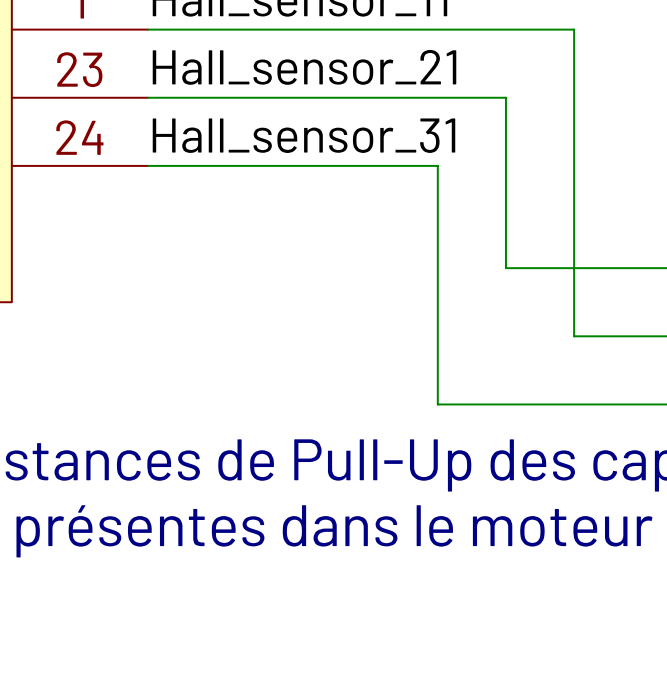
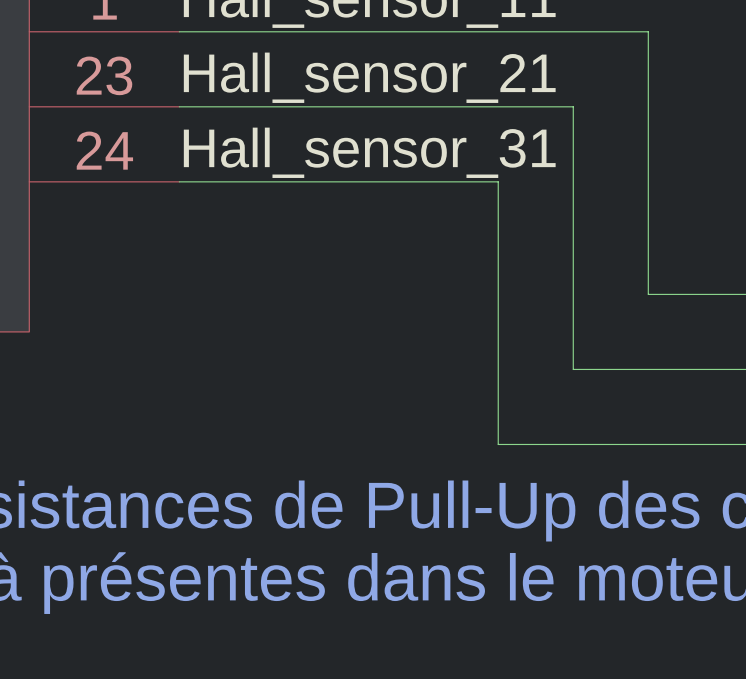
wire: (505, 268) (574, 268) (574, 336) -> (573, 294) (573, 369) (648, 369)

